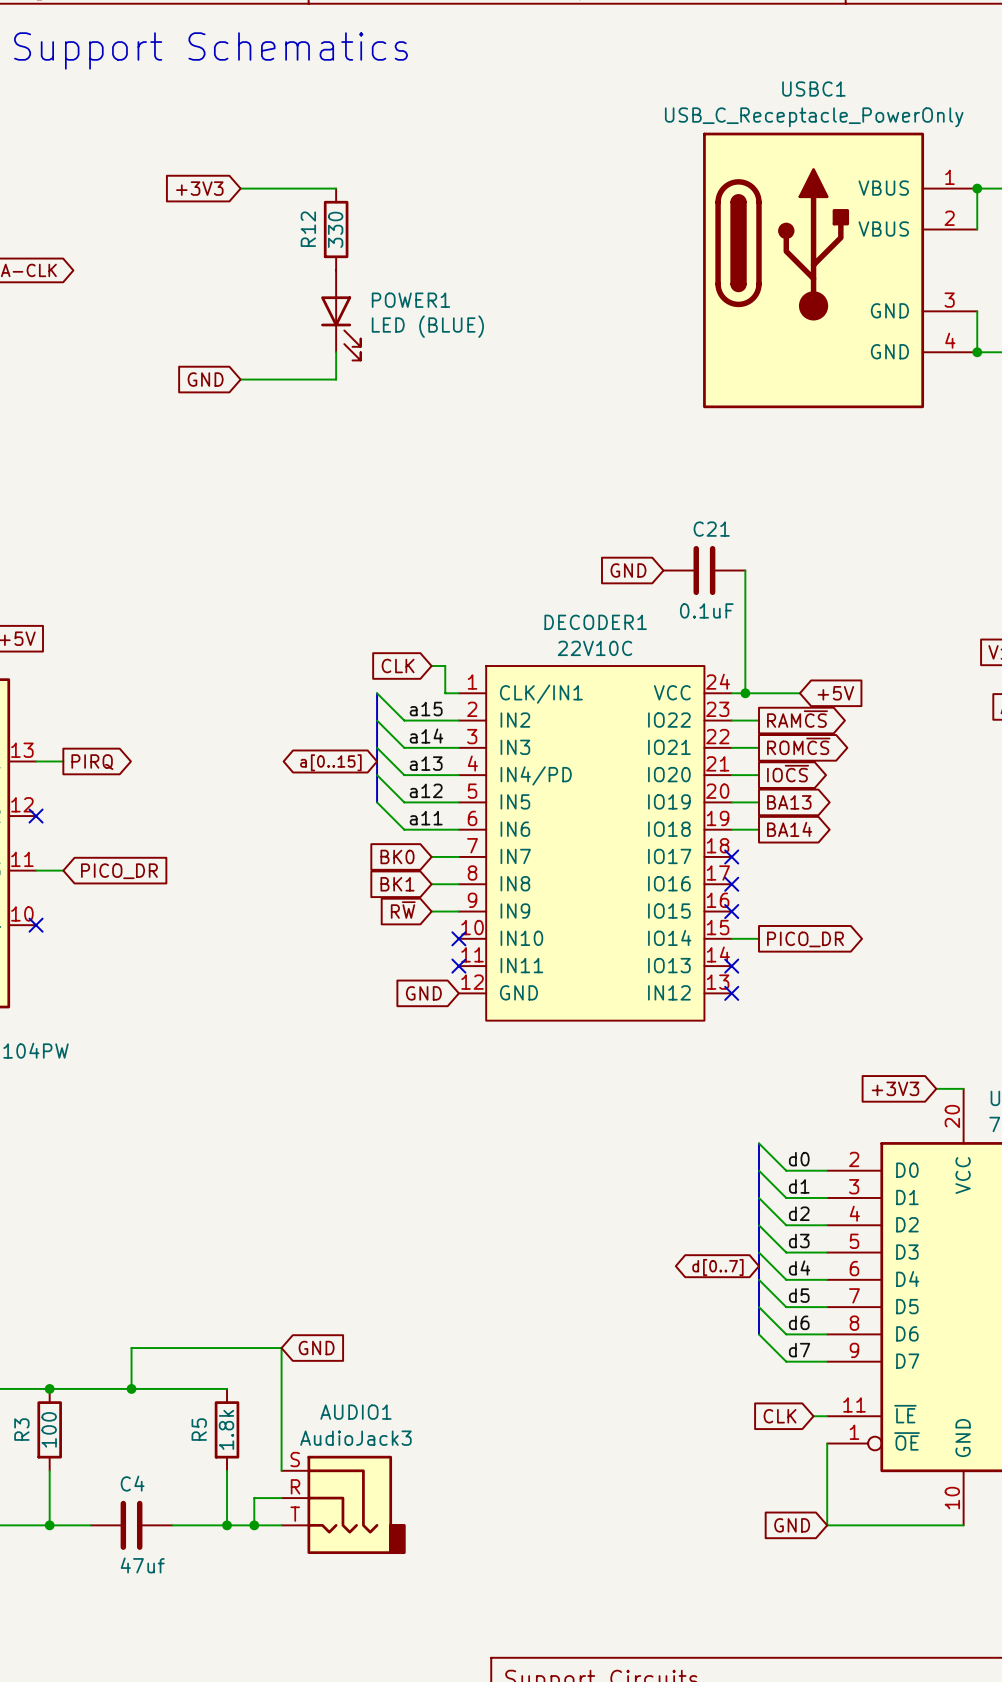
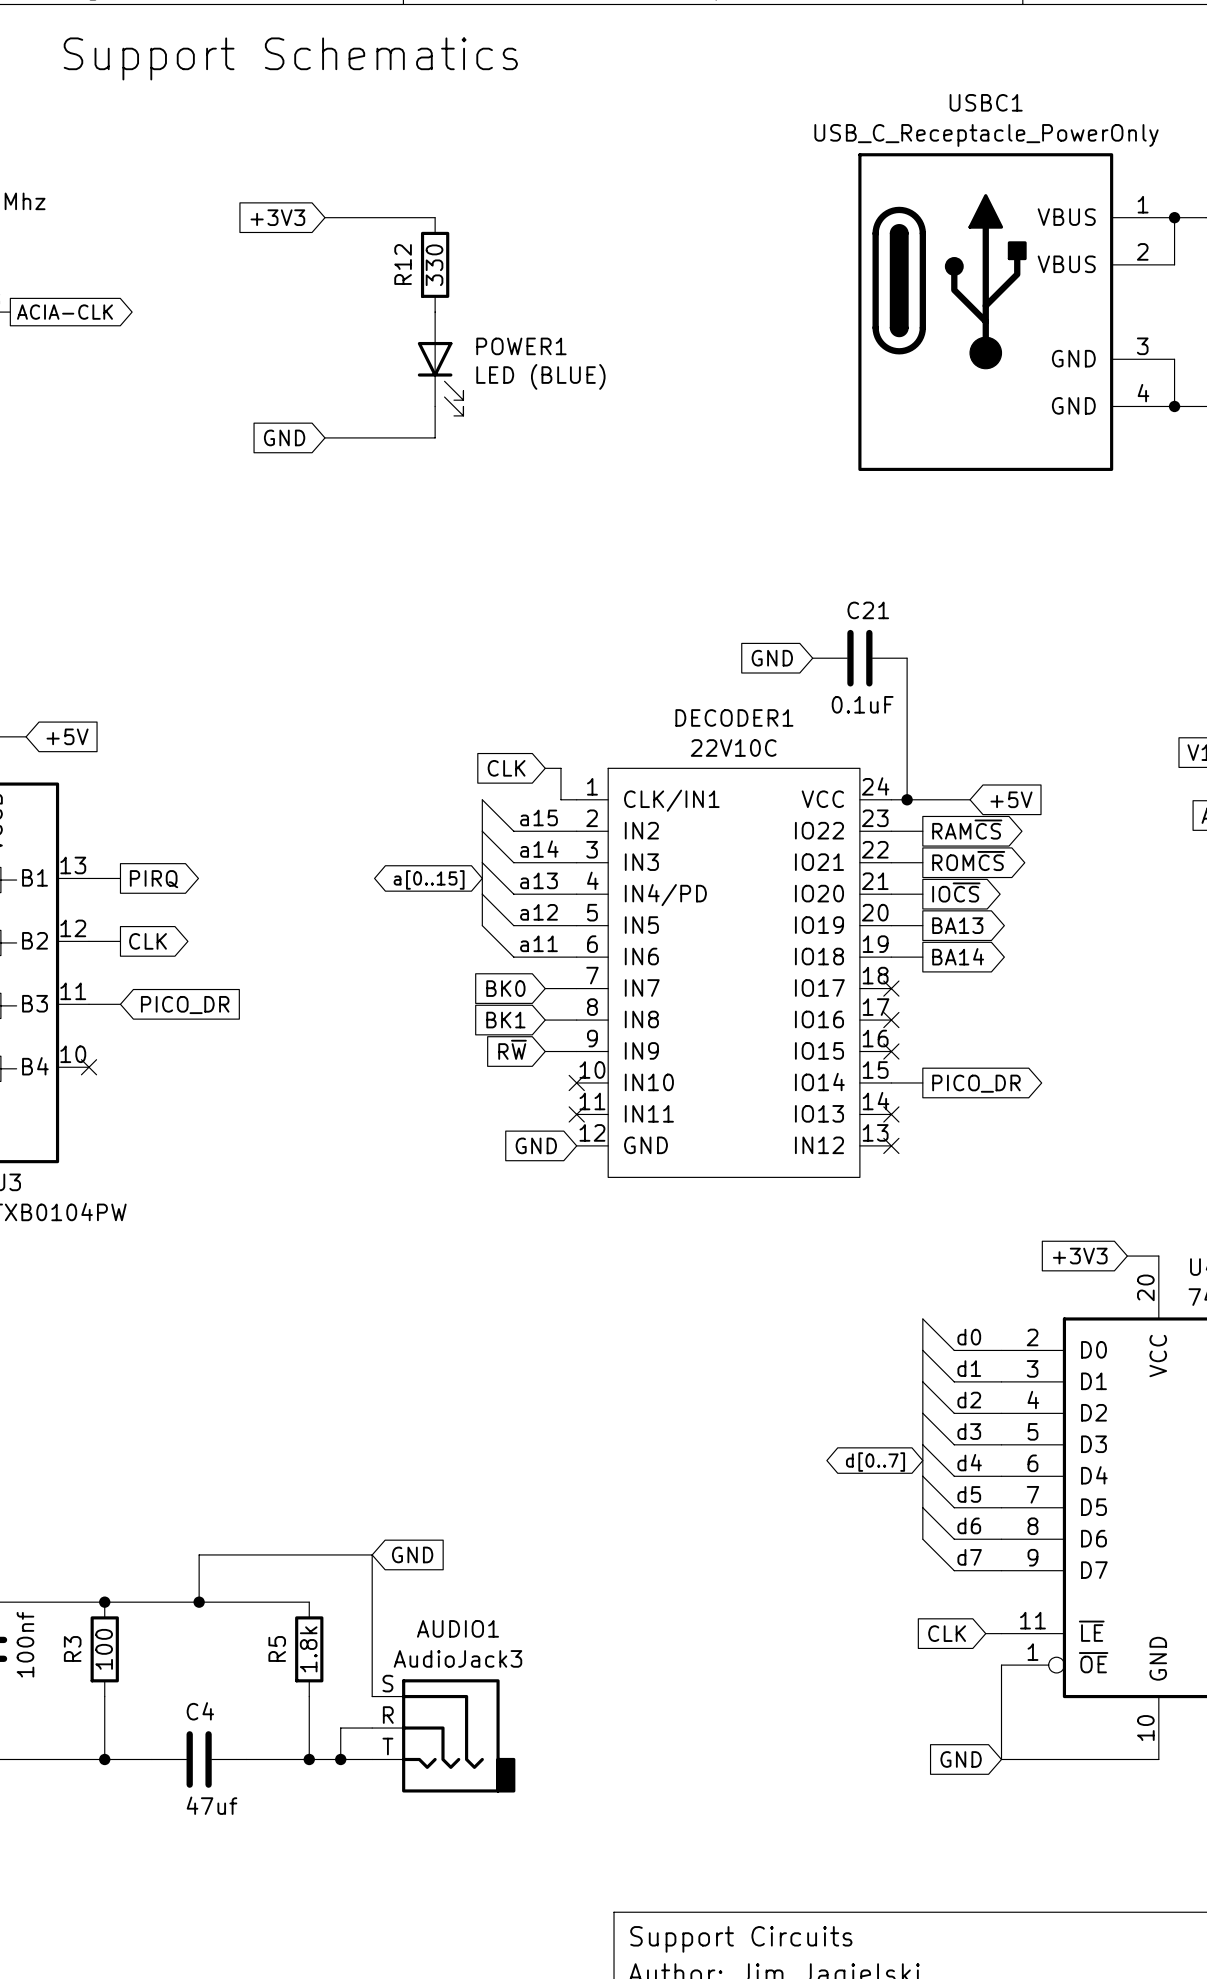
wire: none -> (89, 941) (120, 941)
no-connect mark: (36, 816) -> none
global label: none -> CLK (148, 941)

